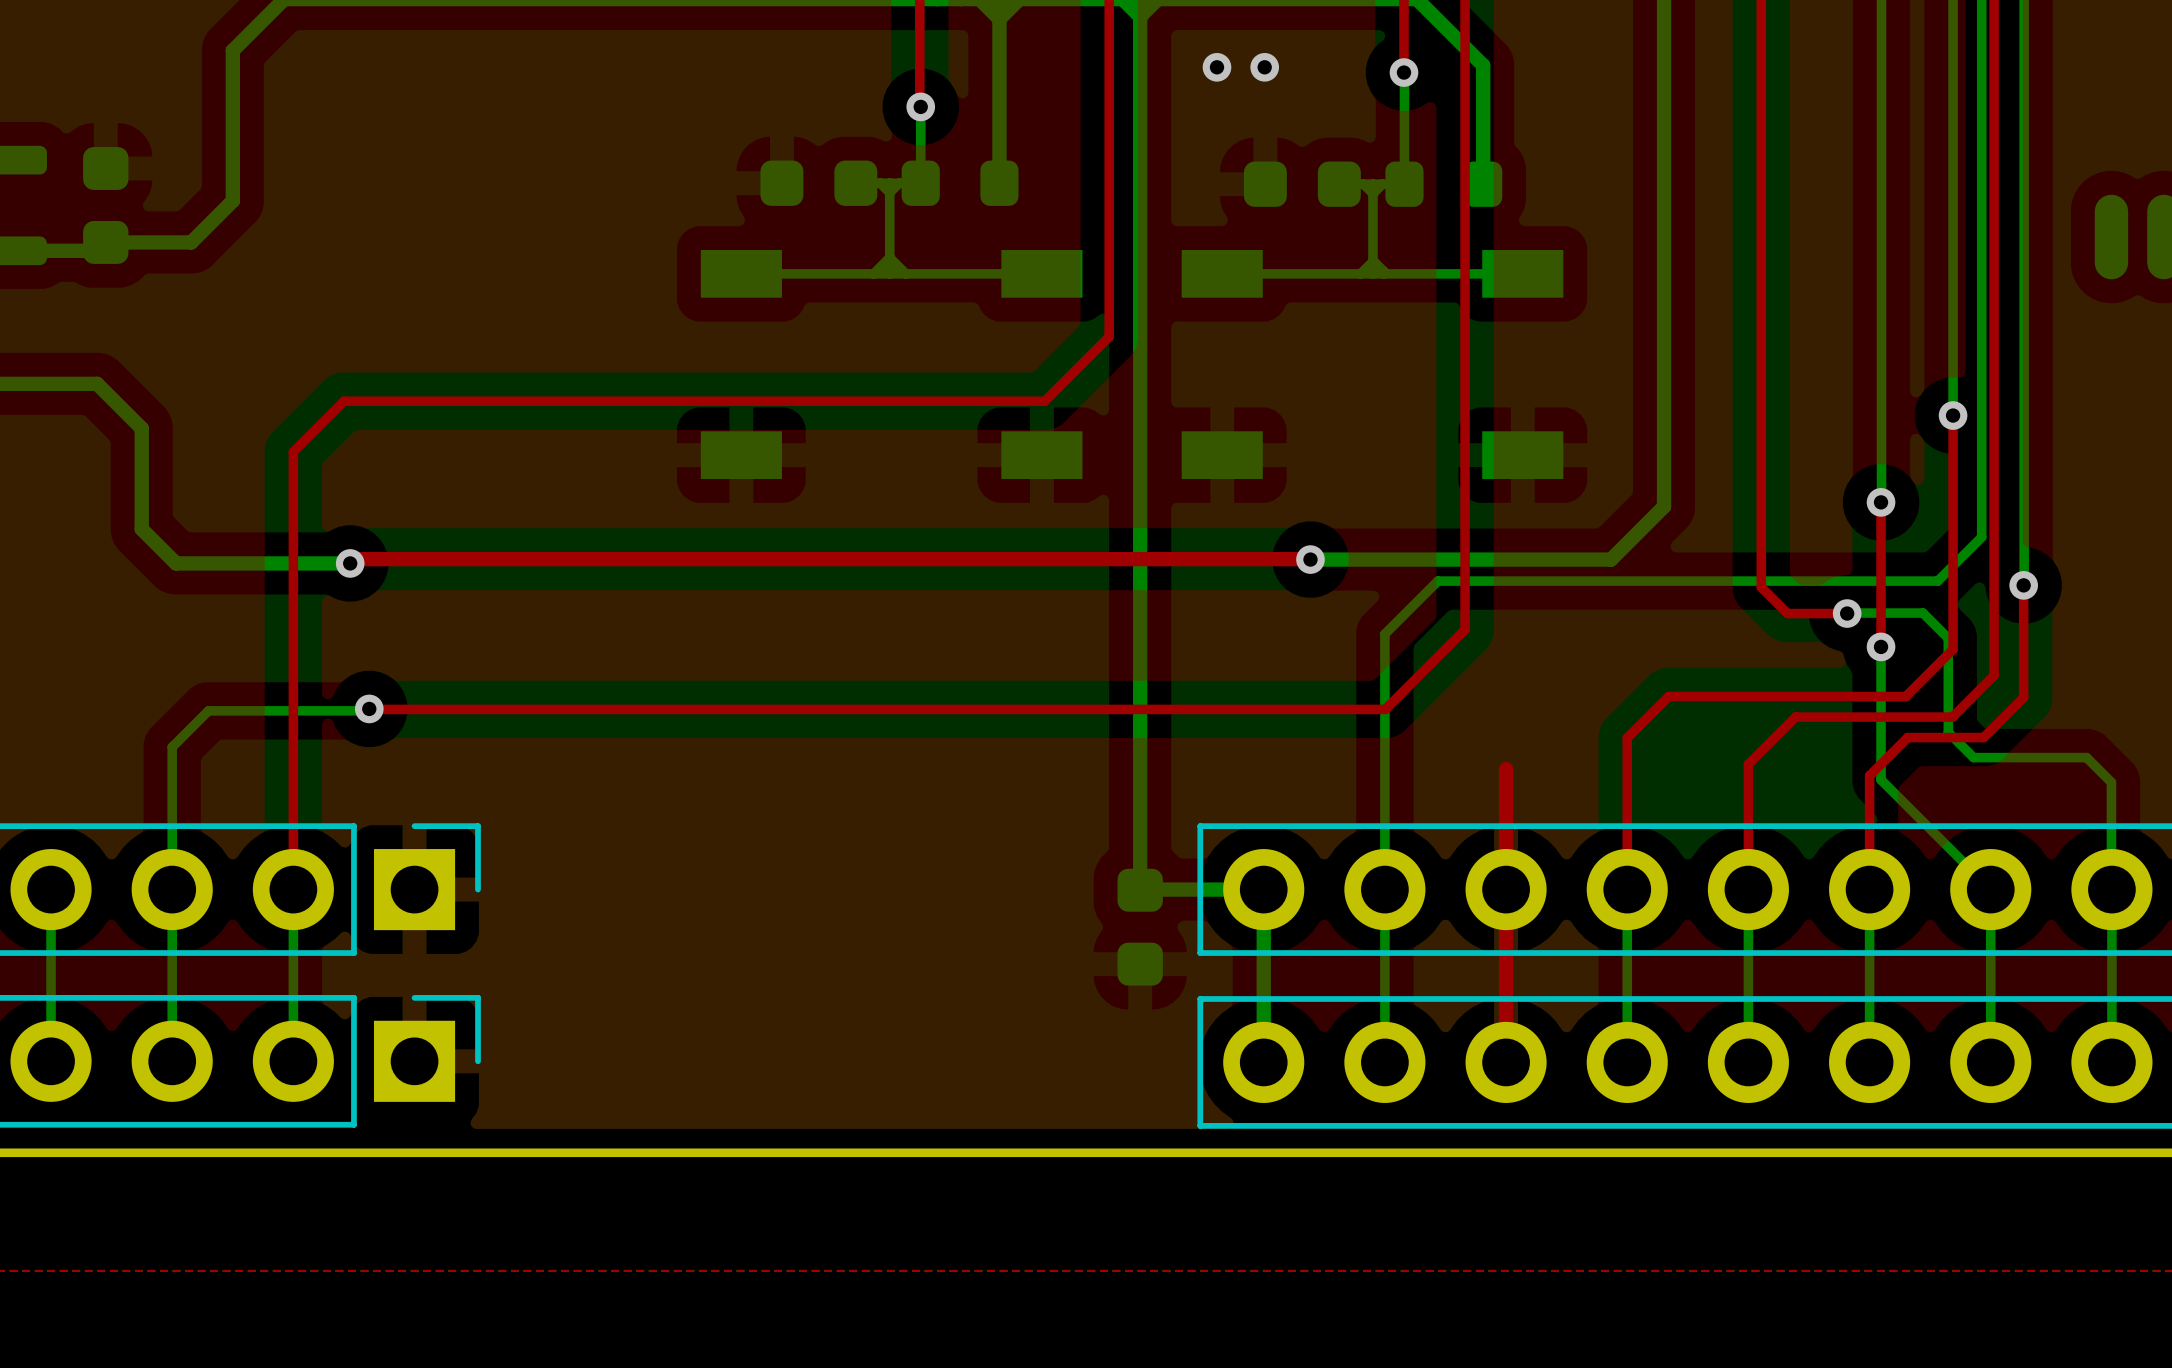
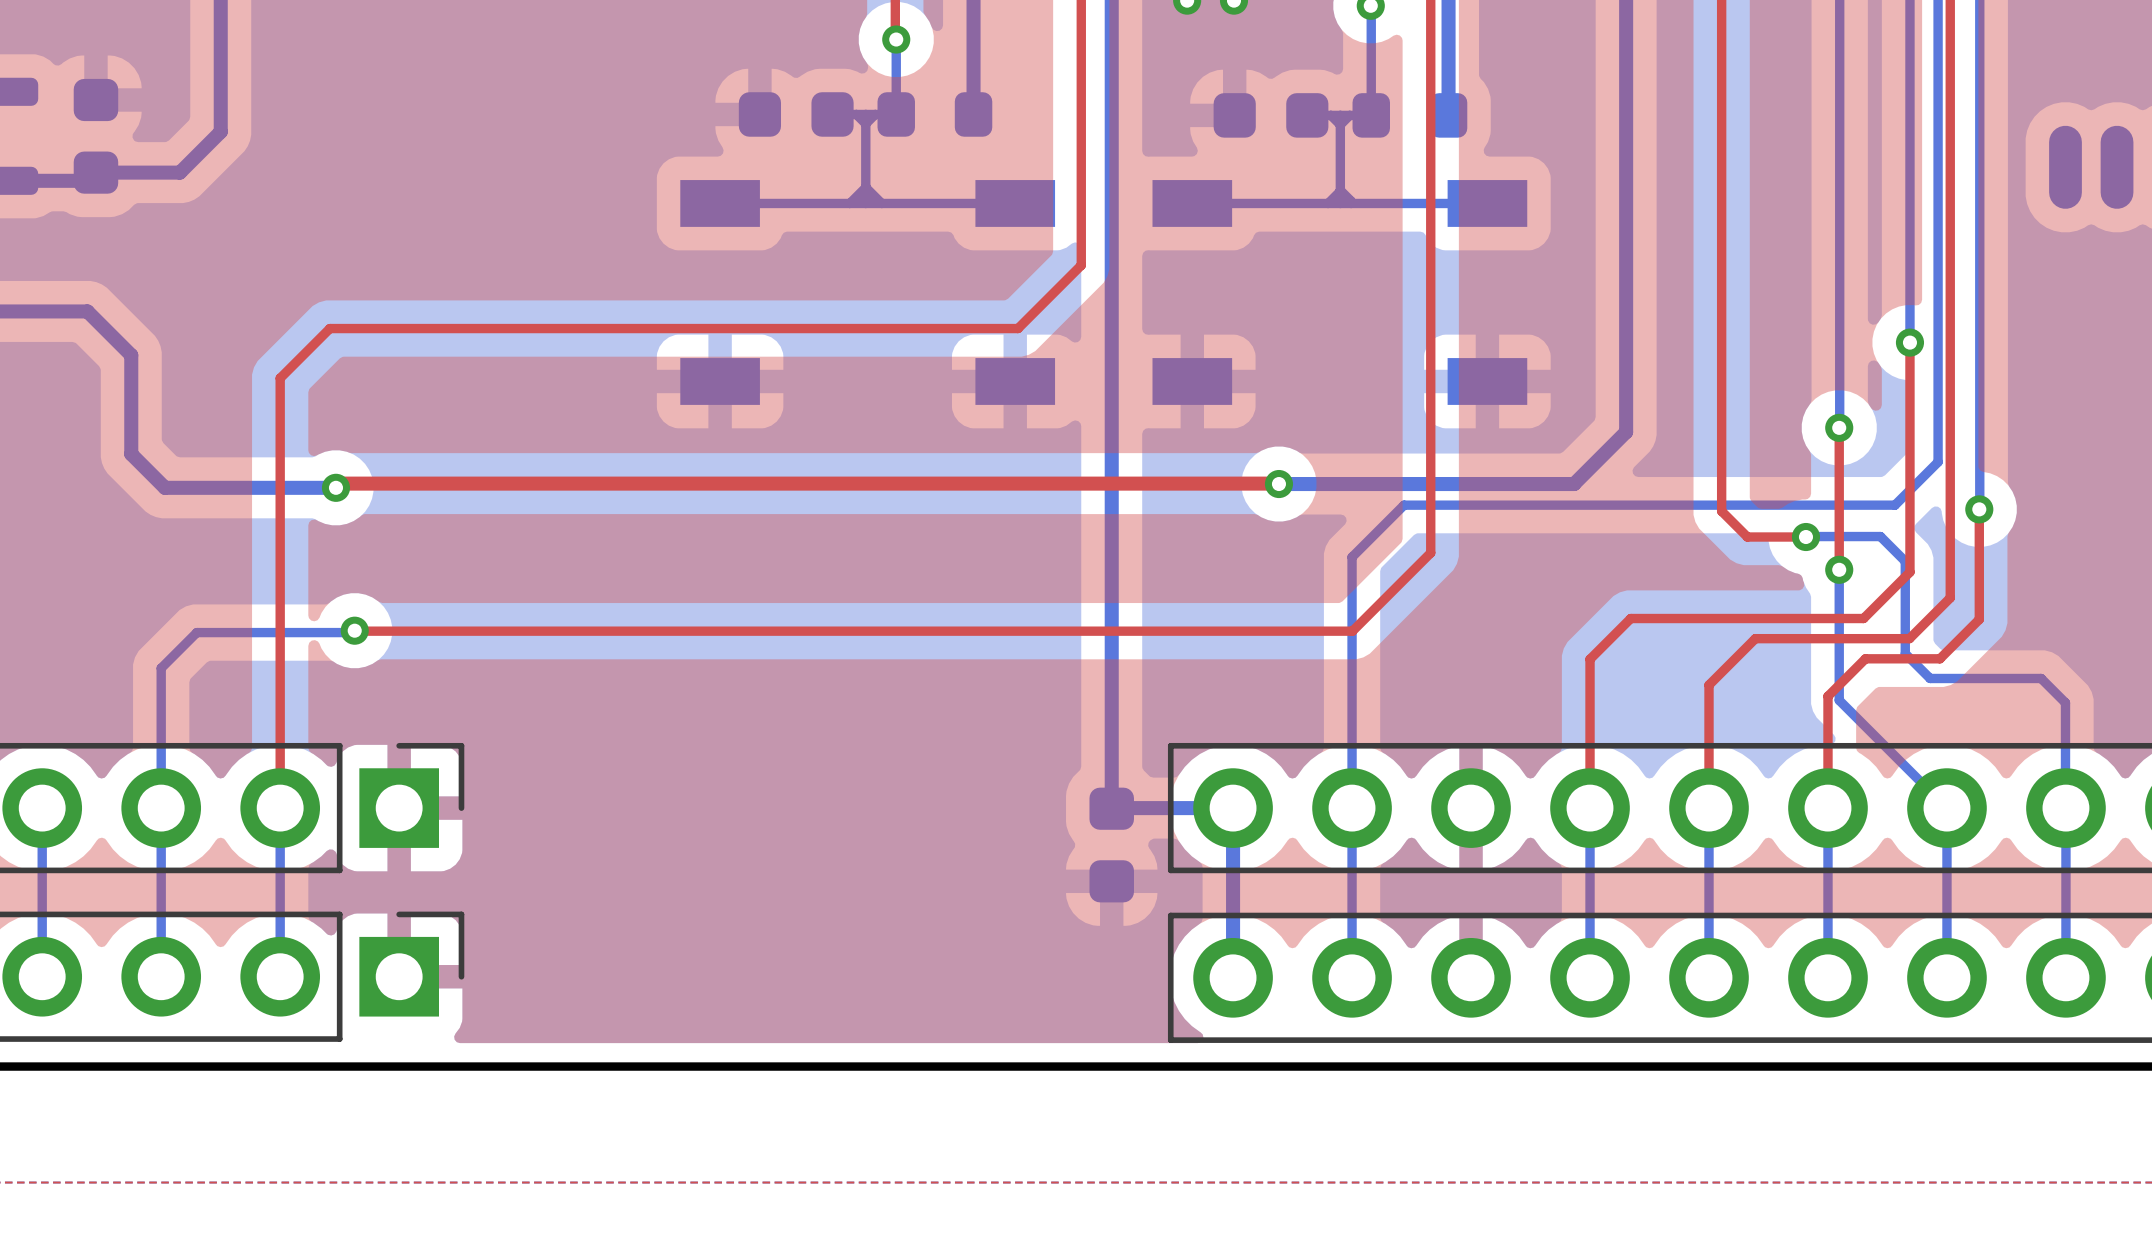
top track: (1506, 769) (1506, 1062) -> none

